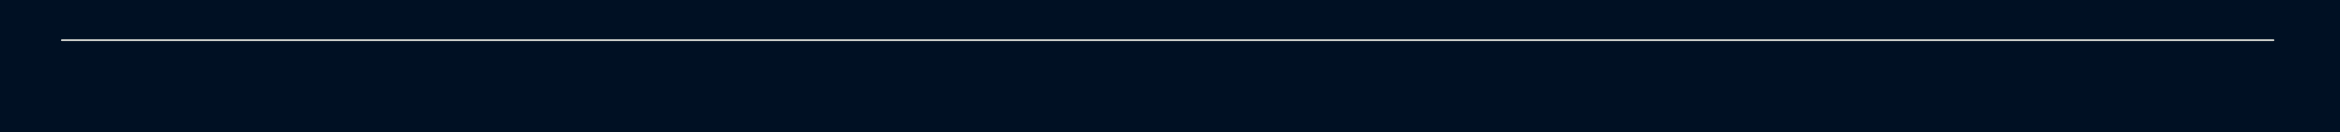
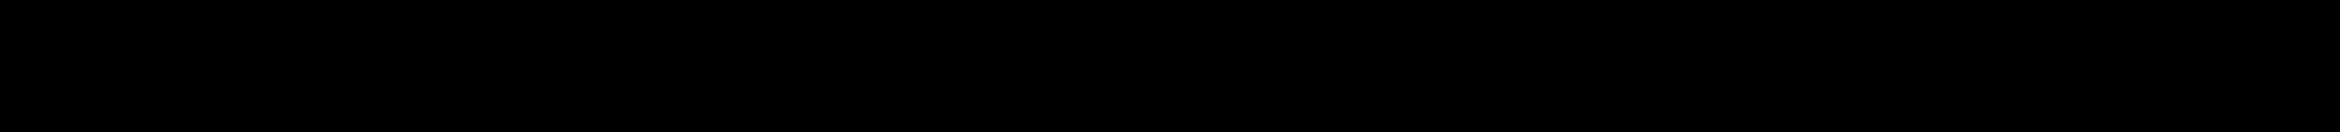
board edge: (2273, 40) (61, 40) -> none

